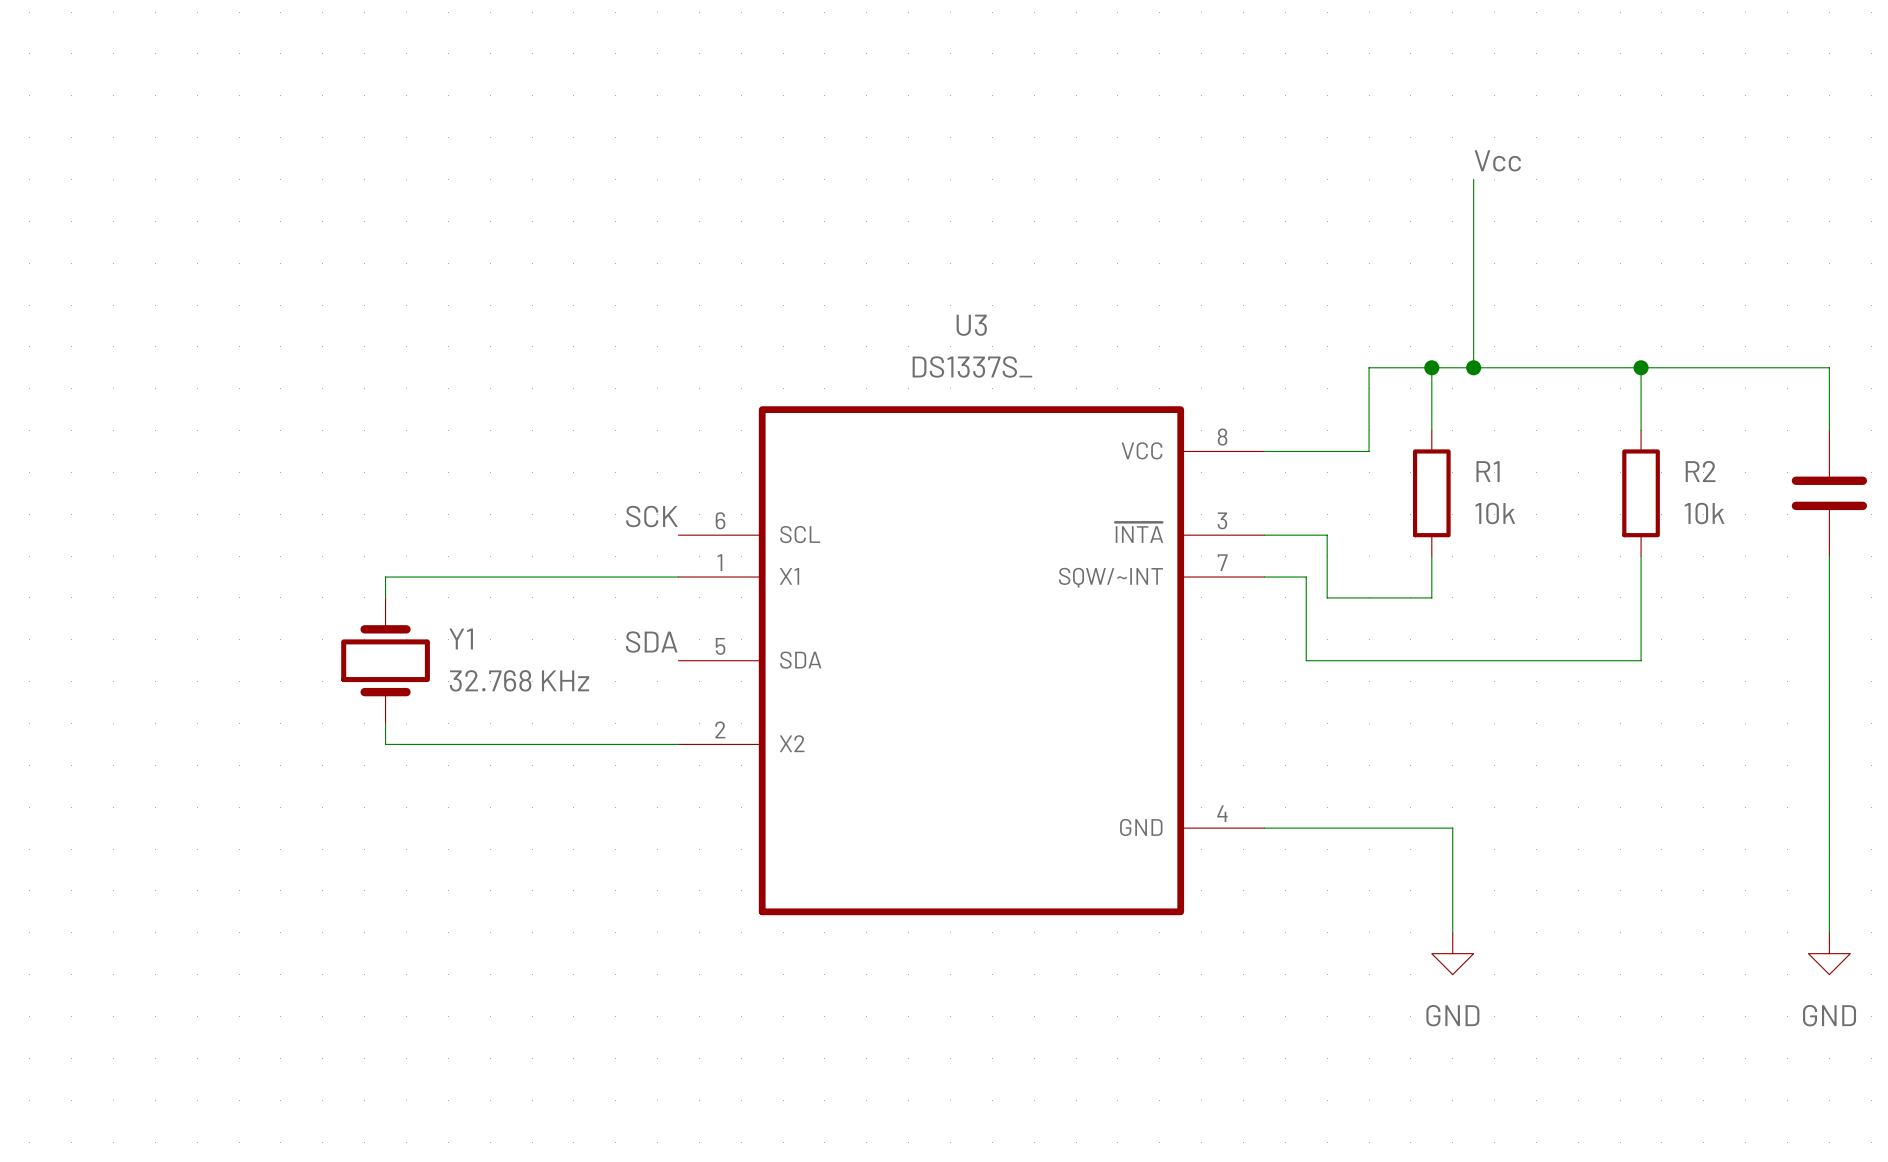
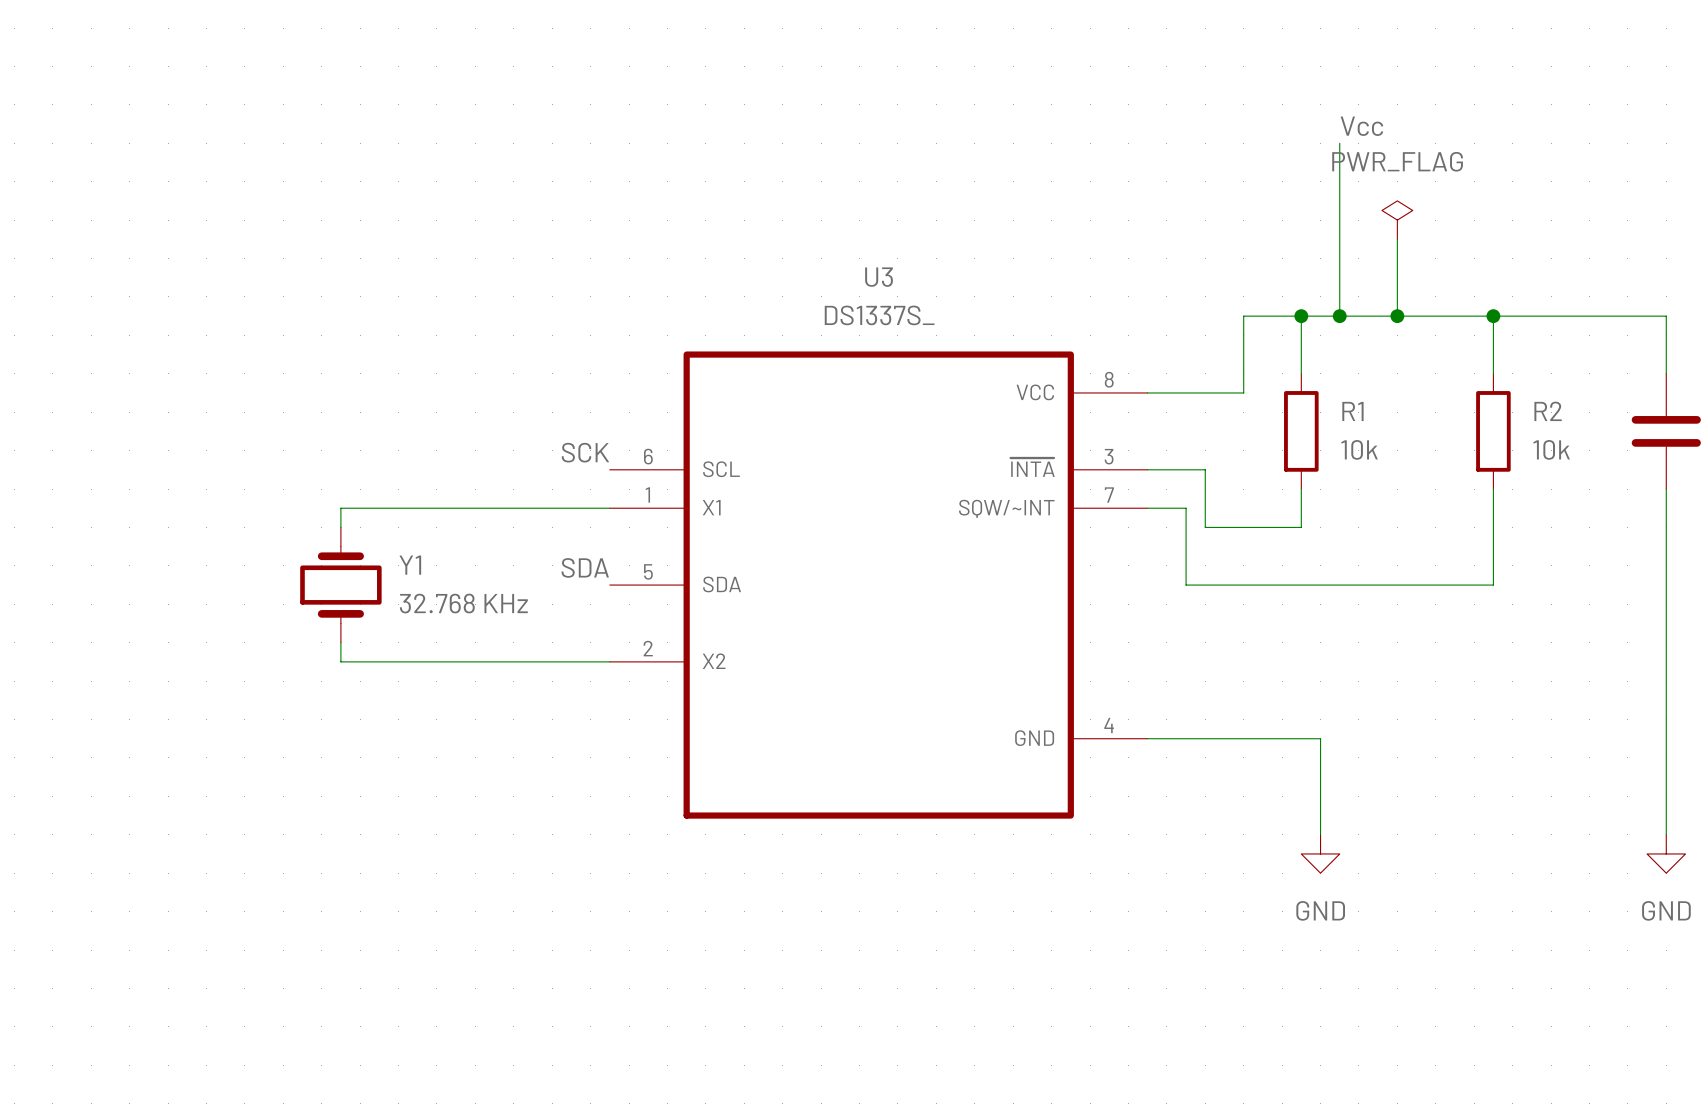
power symbol: none -> PWR_FLAG (1397, 220)
wire: none -> (1397, 239) (1397, 316)
junction: none -> (1397, 316)

